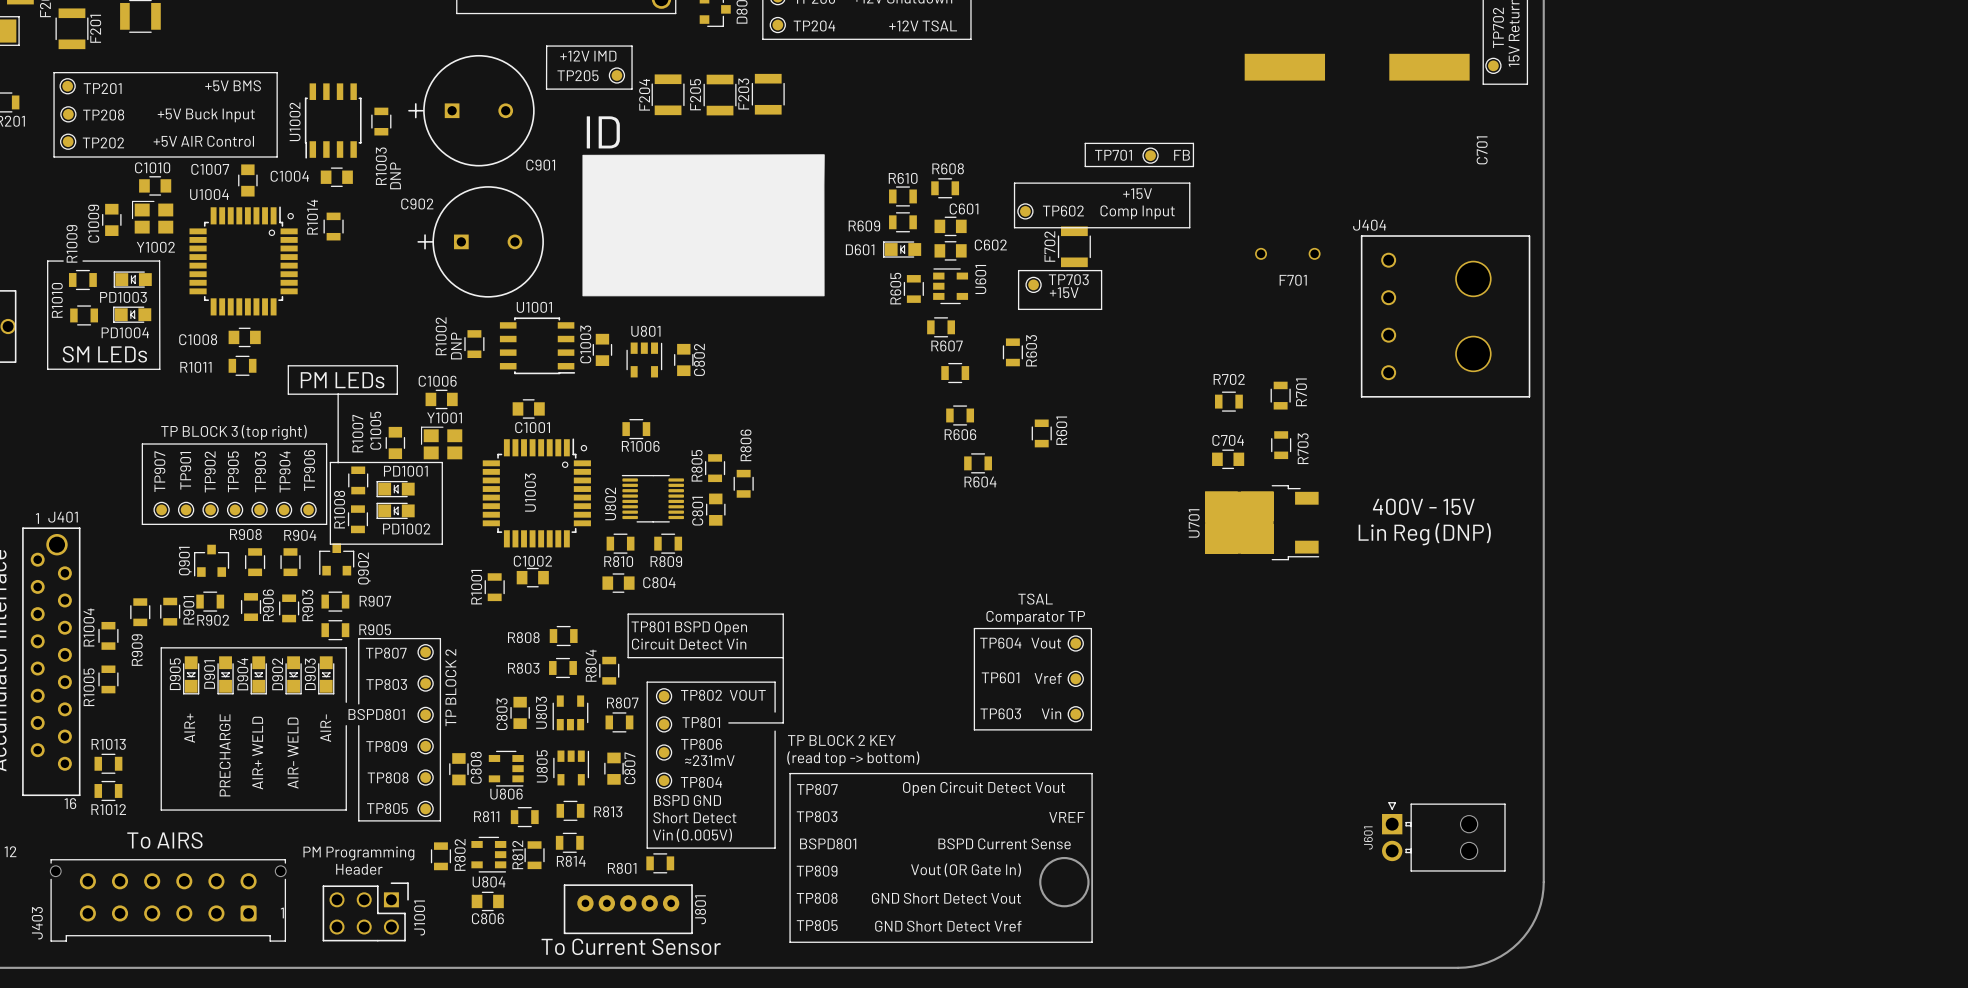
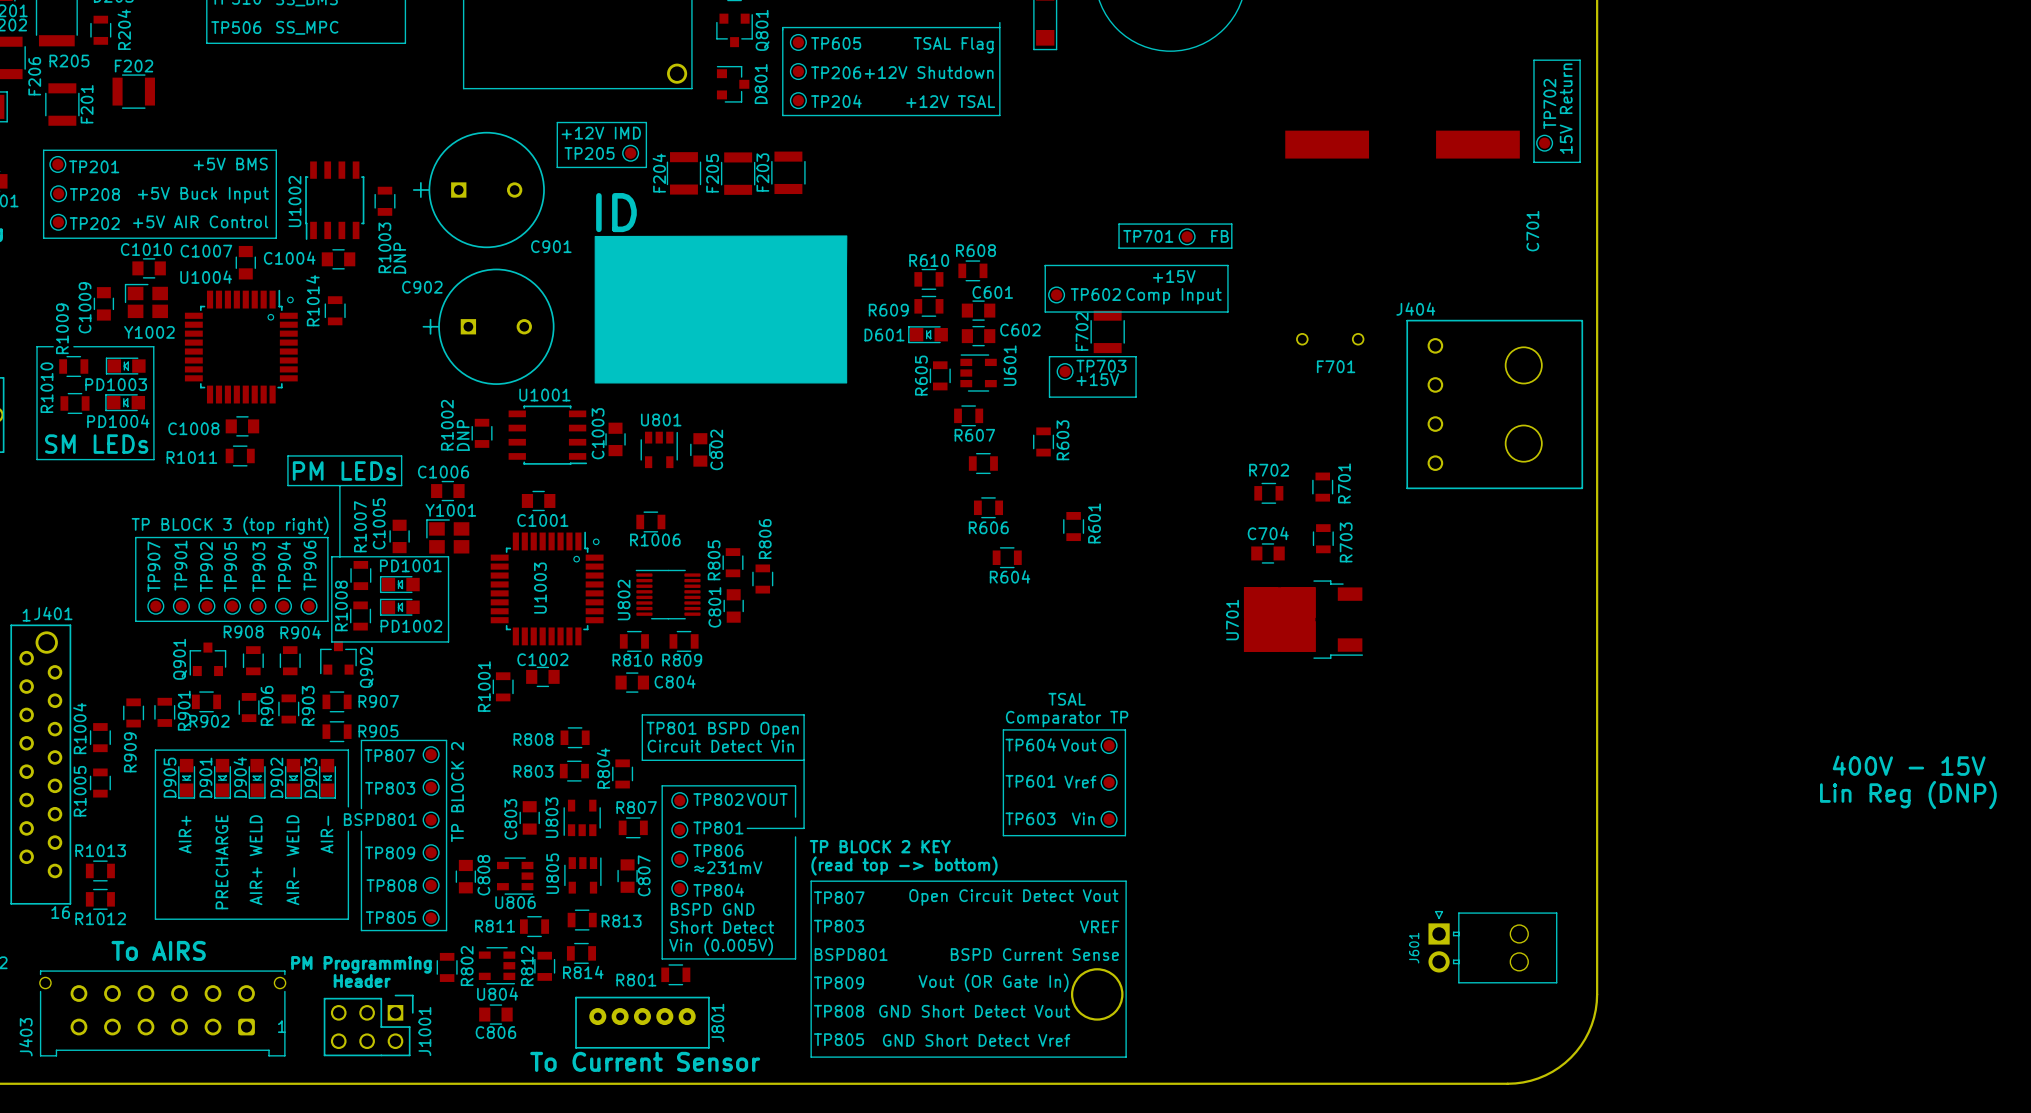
text: 400V - 15V (1423, 506) -> none
text: Lin Reg (DNP) (1424, 534) -> none
text: none -> 400V - 15V (1909, 765)
text: none -> Lin Reg (DNP) (1908, 795)

